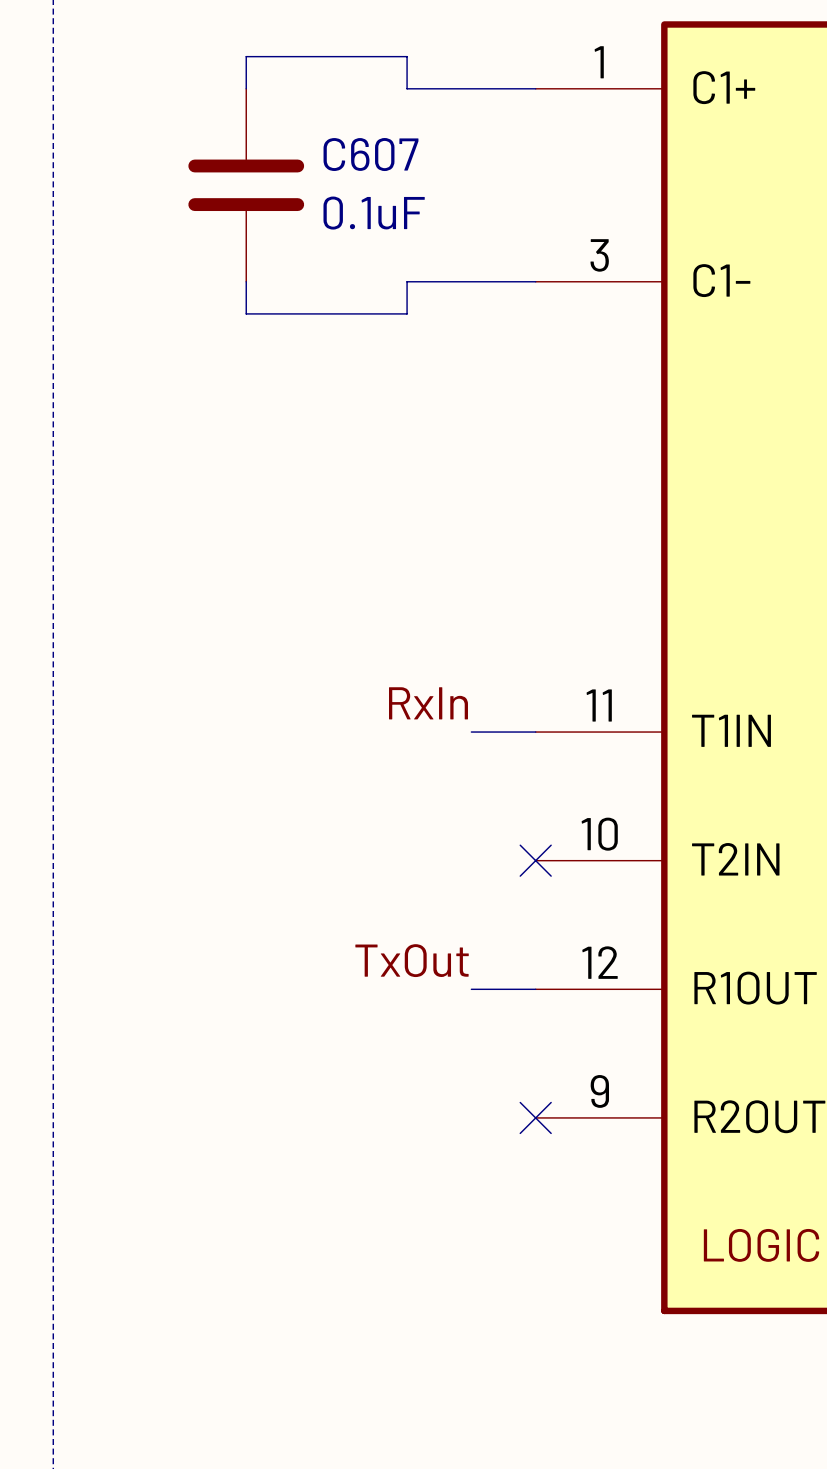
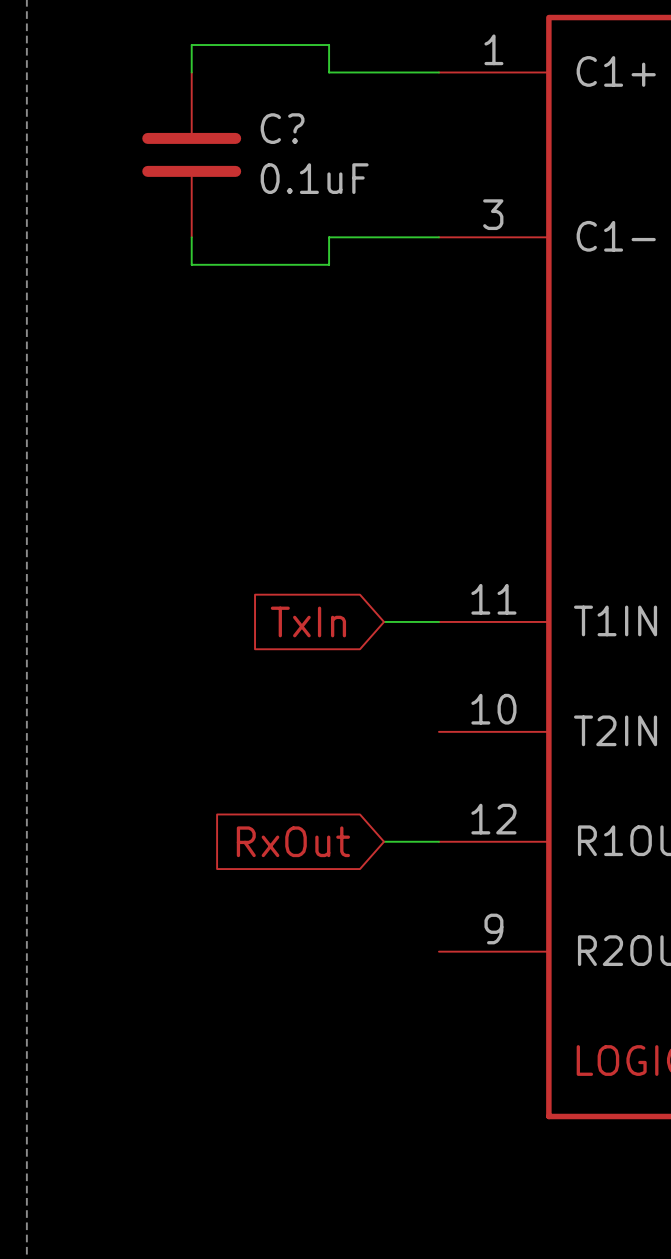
C607 name: C607 (370, 154) -> C? (282, 128)
label: RxIn (428, 703) -> none
global label: none -> TxIn (308, 621)
no-connect mark: (535, 860) -> none
label: TxOut (412, 960) -> none
global label: none -> RxOut (293, 841)
no-connect mark: (535, 1117) -> none

